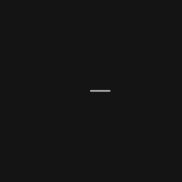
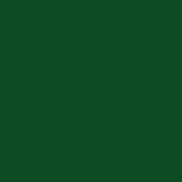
board edge: (109, 90) (90, 90) -> none

